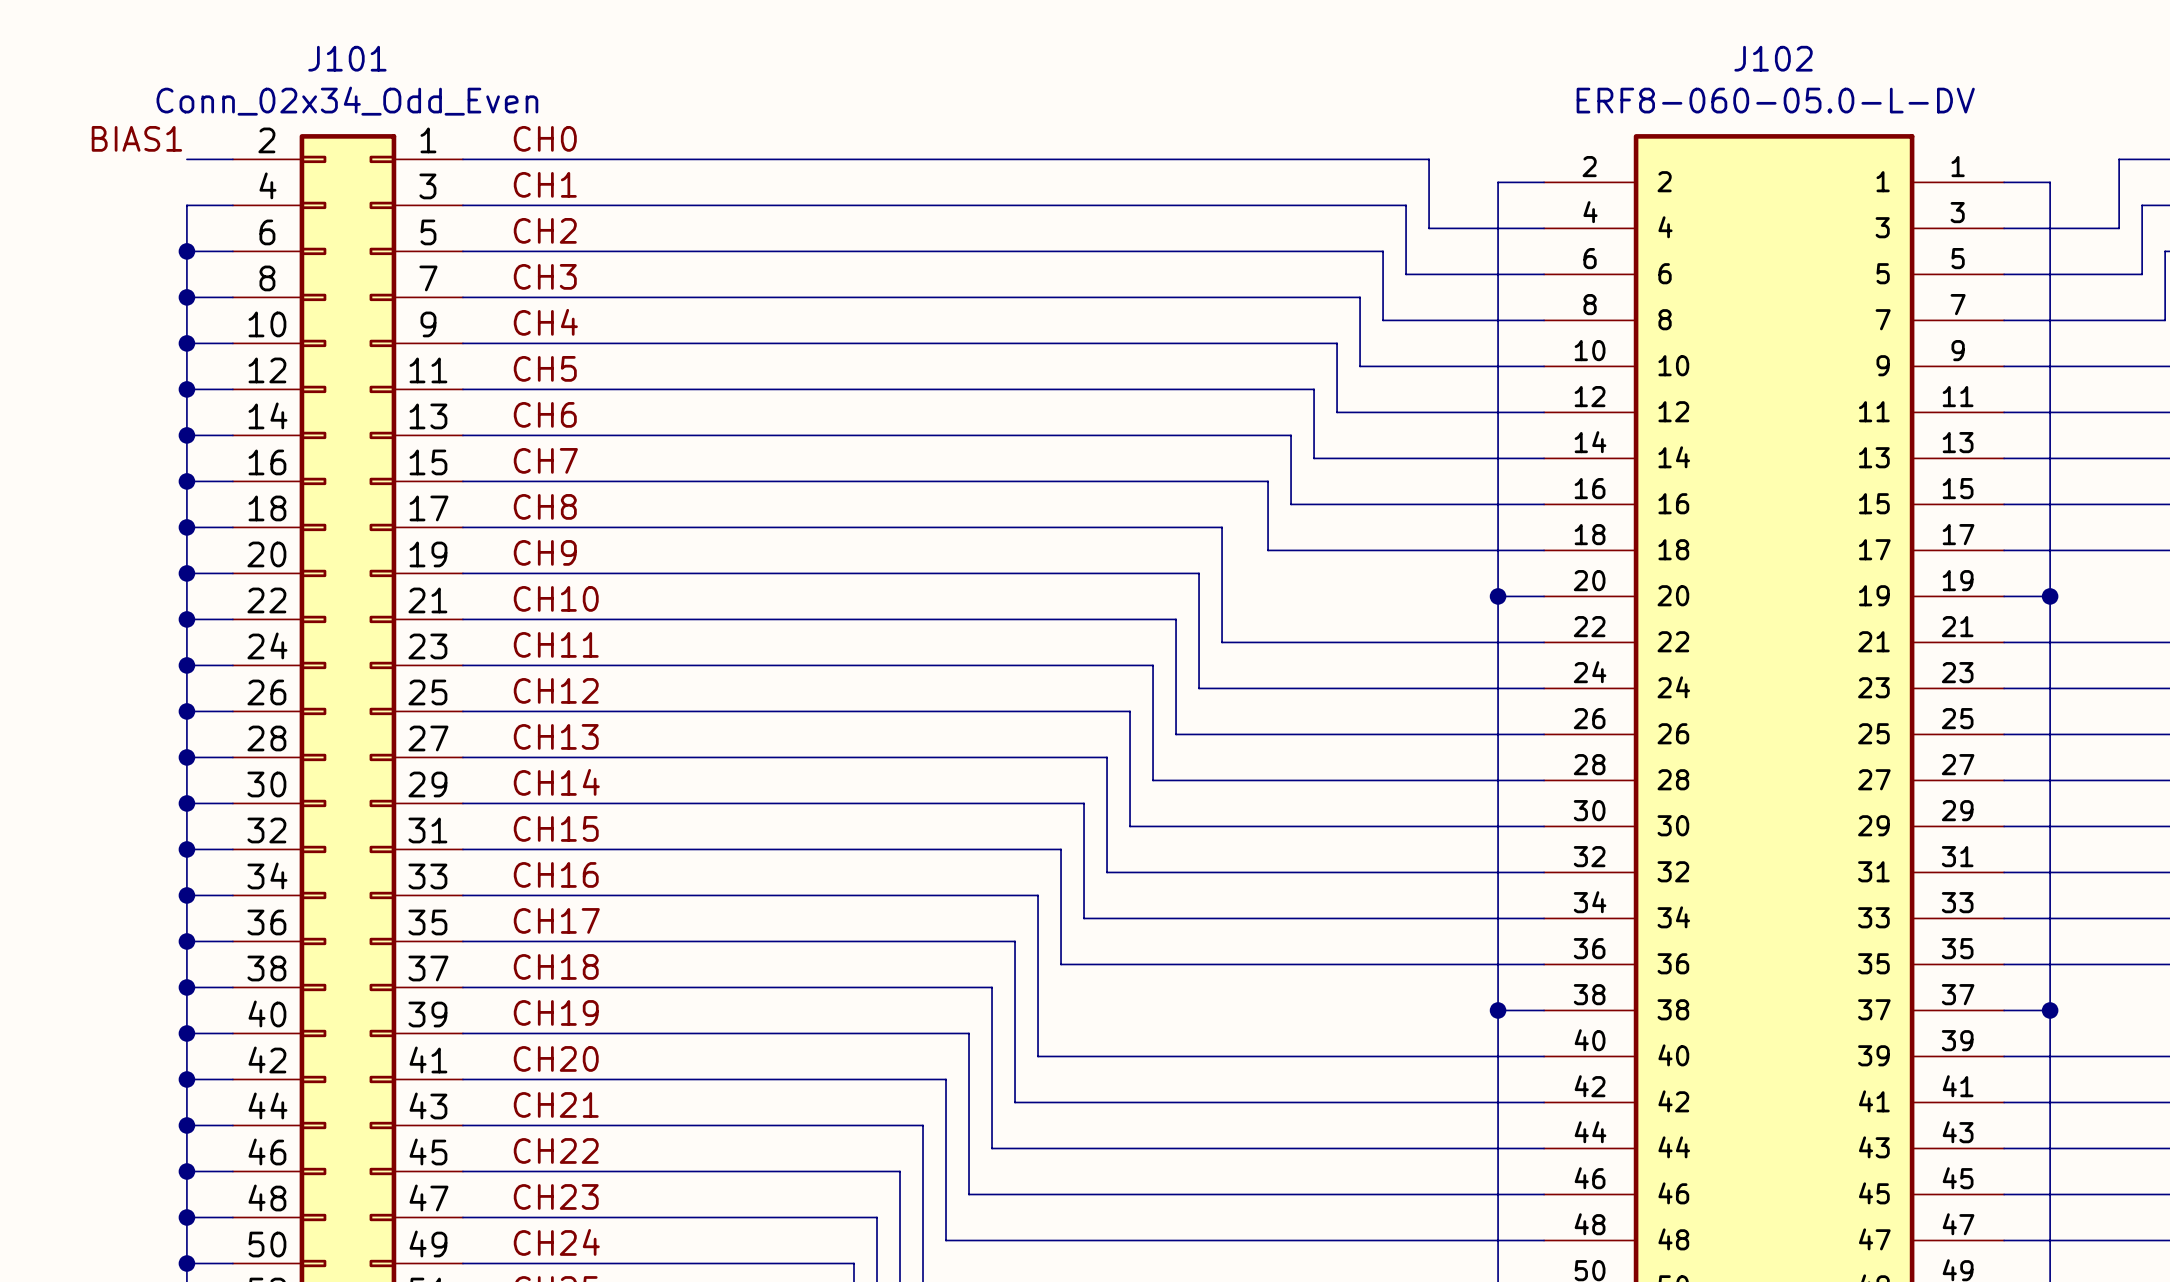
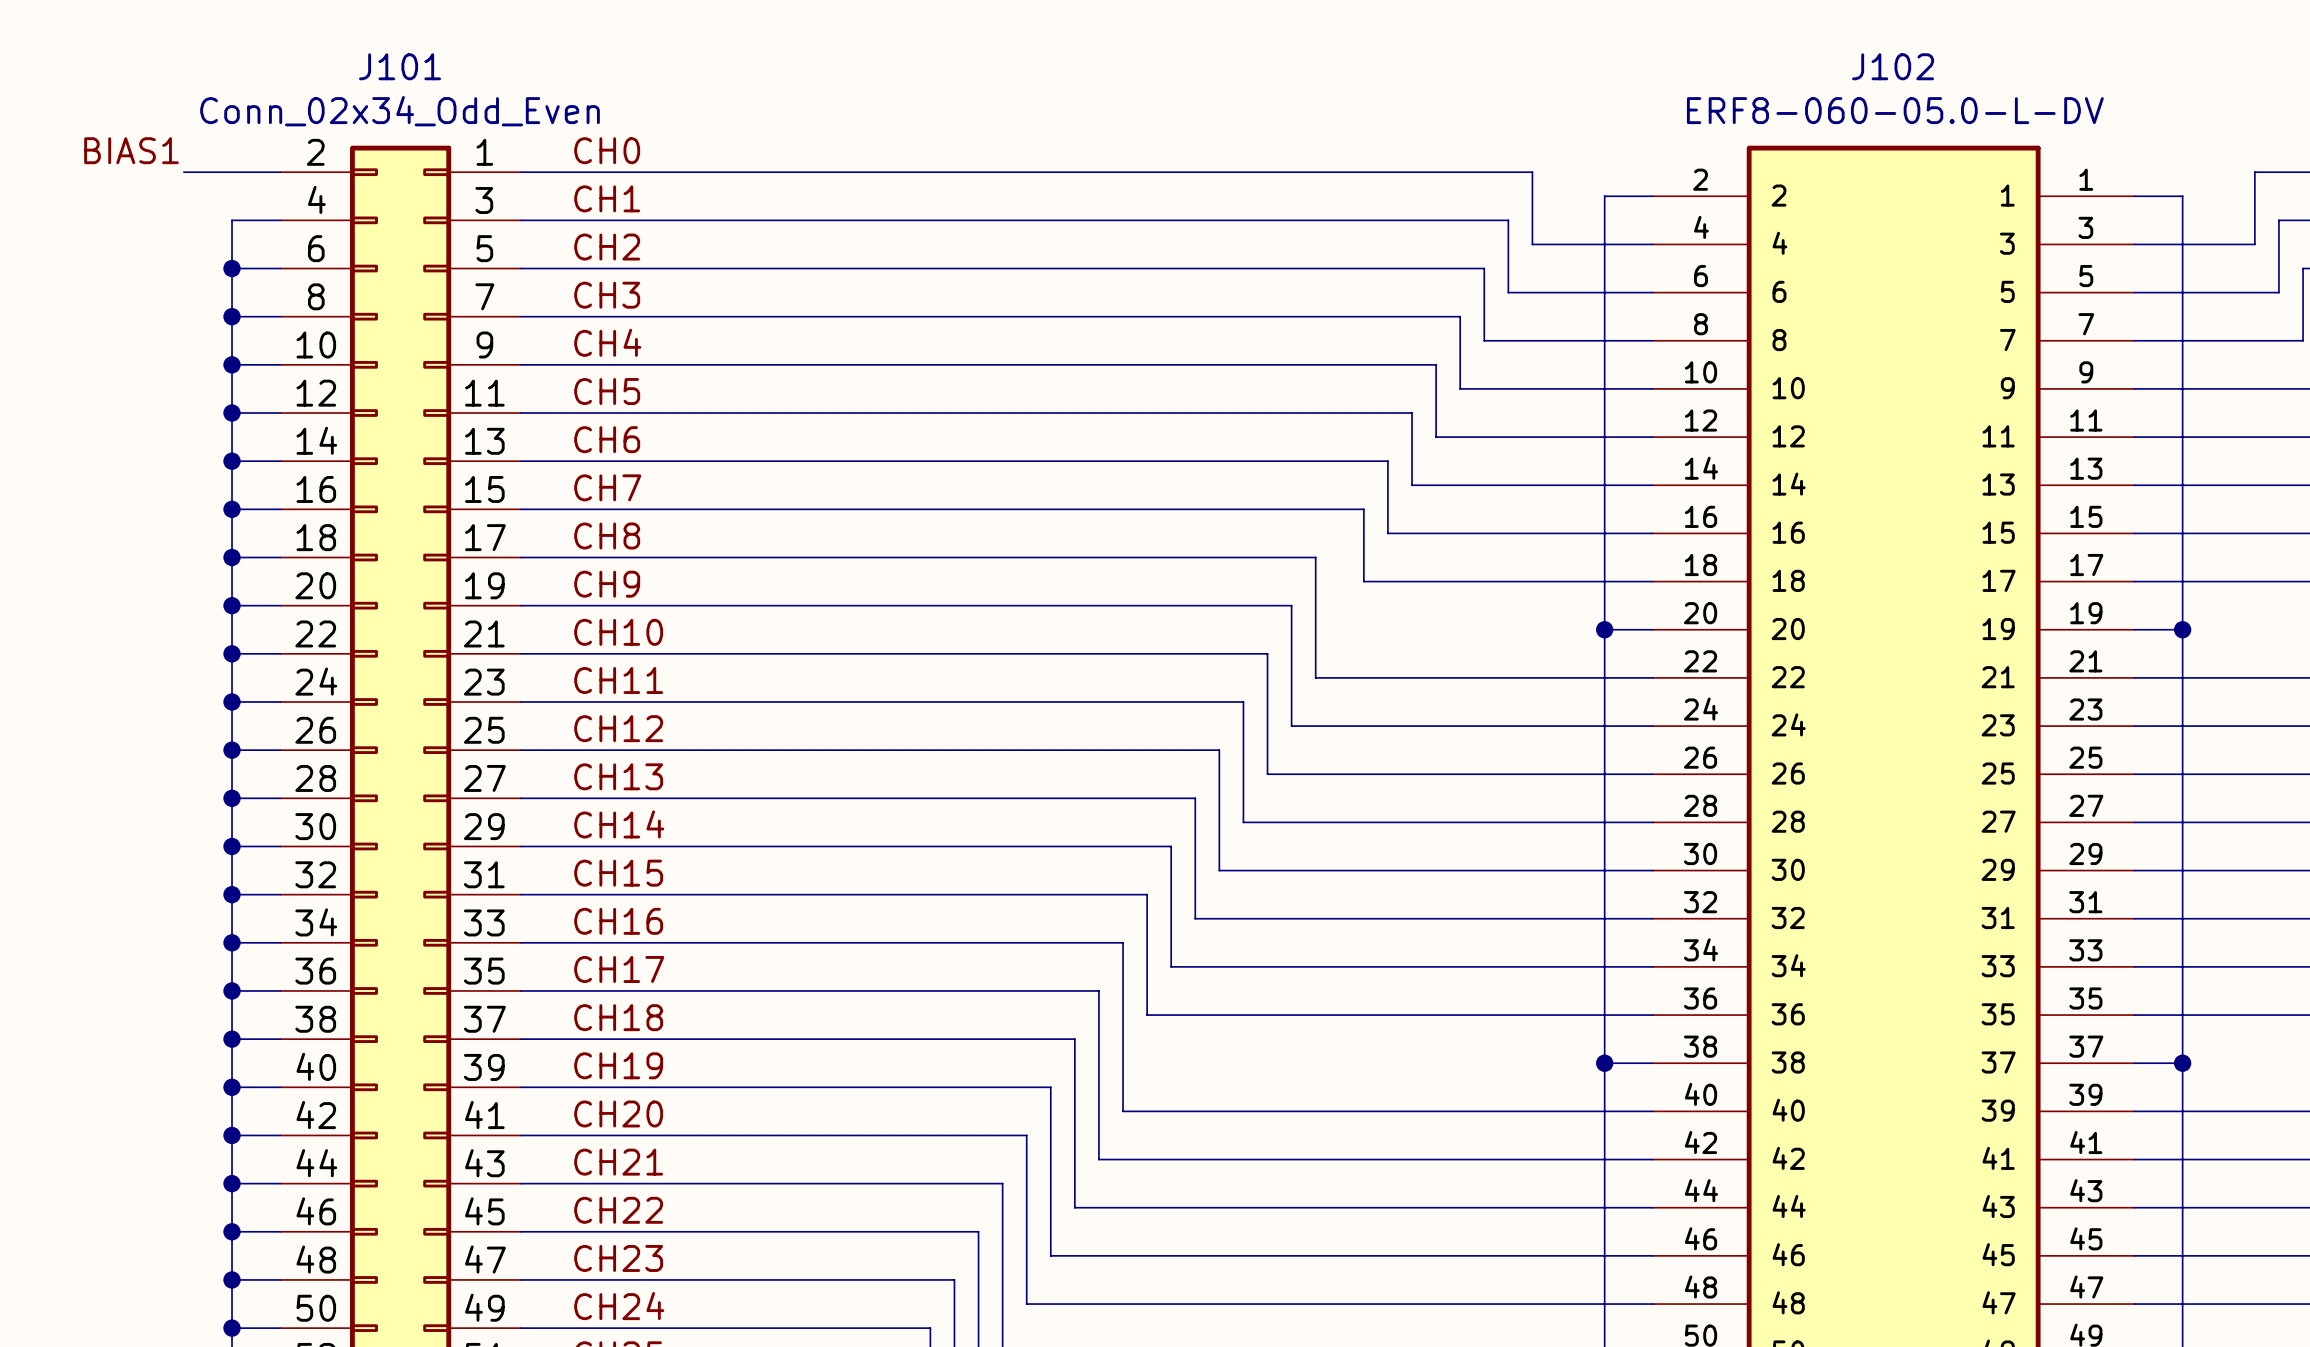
label position: BIAS1 (136, 138) -> BIAS1 (131, 150)
wire: none -> (183, 172) (232, 172)

